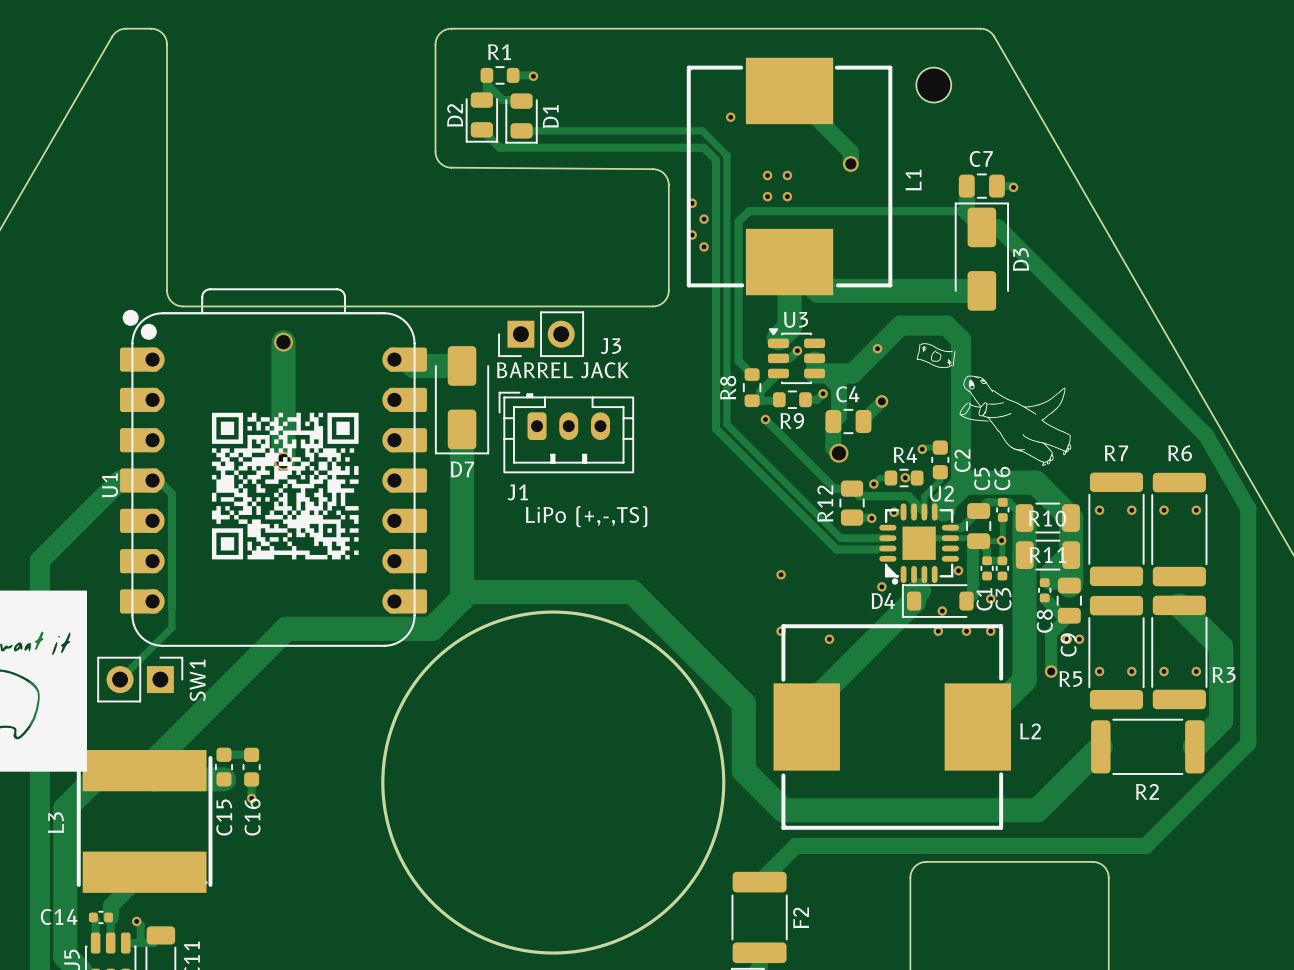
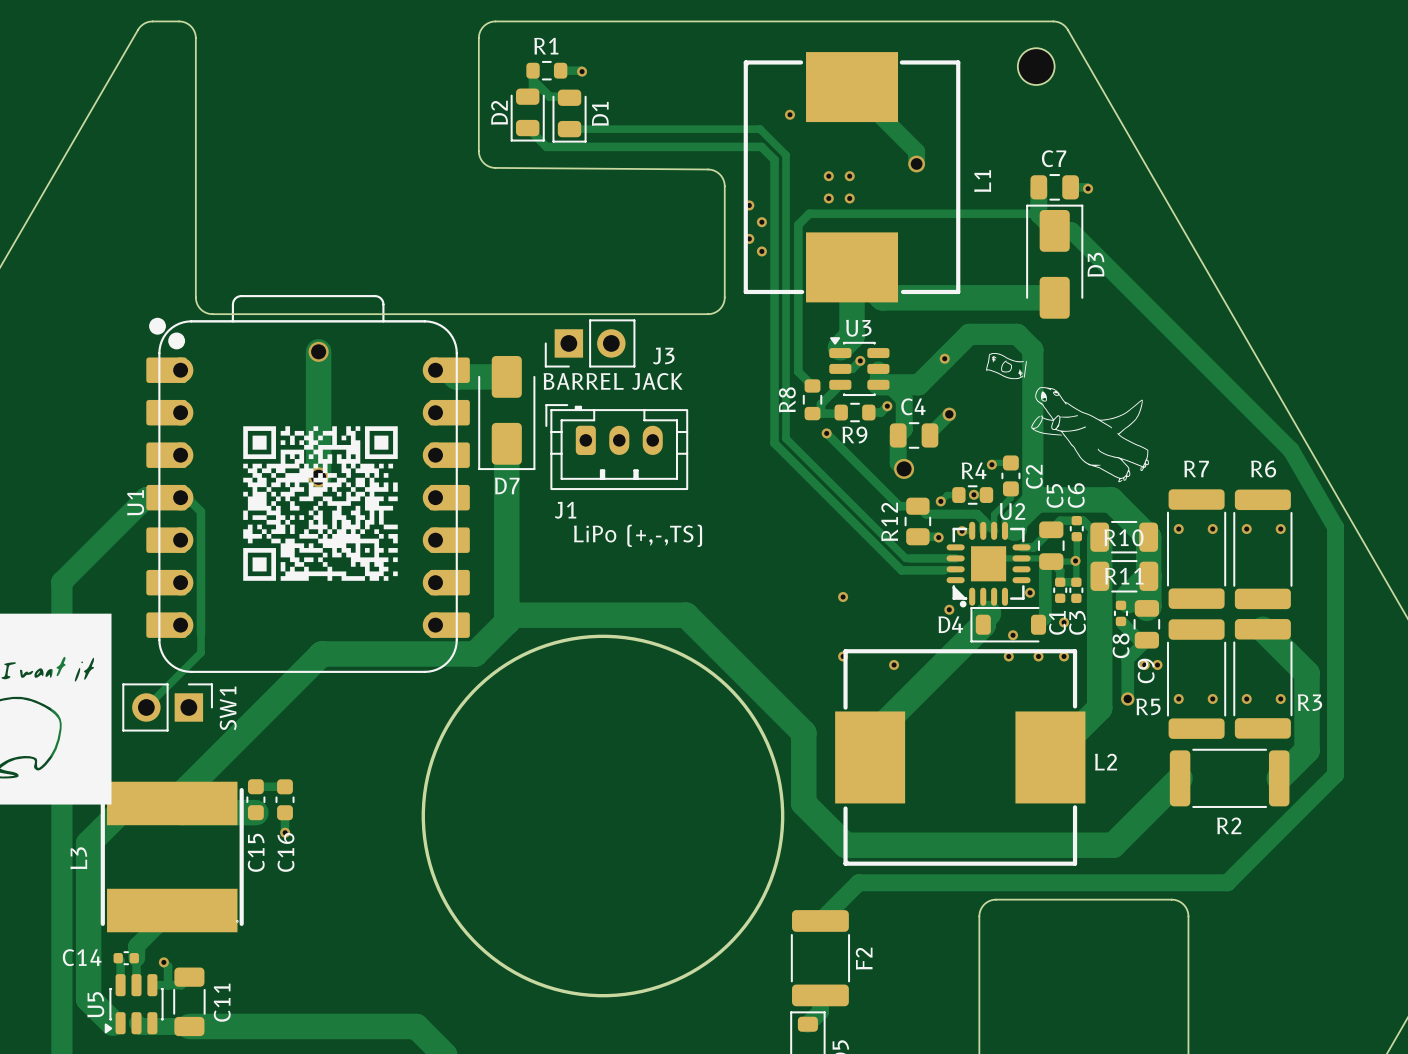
part position: (933, 85) -> (1036, 66)

